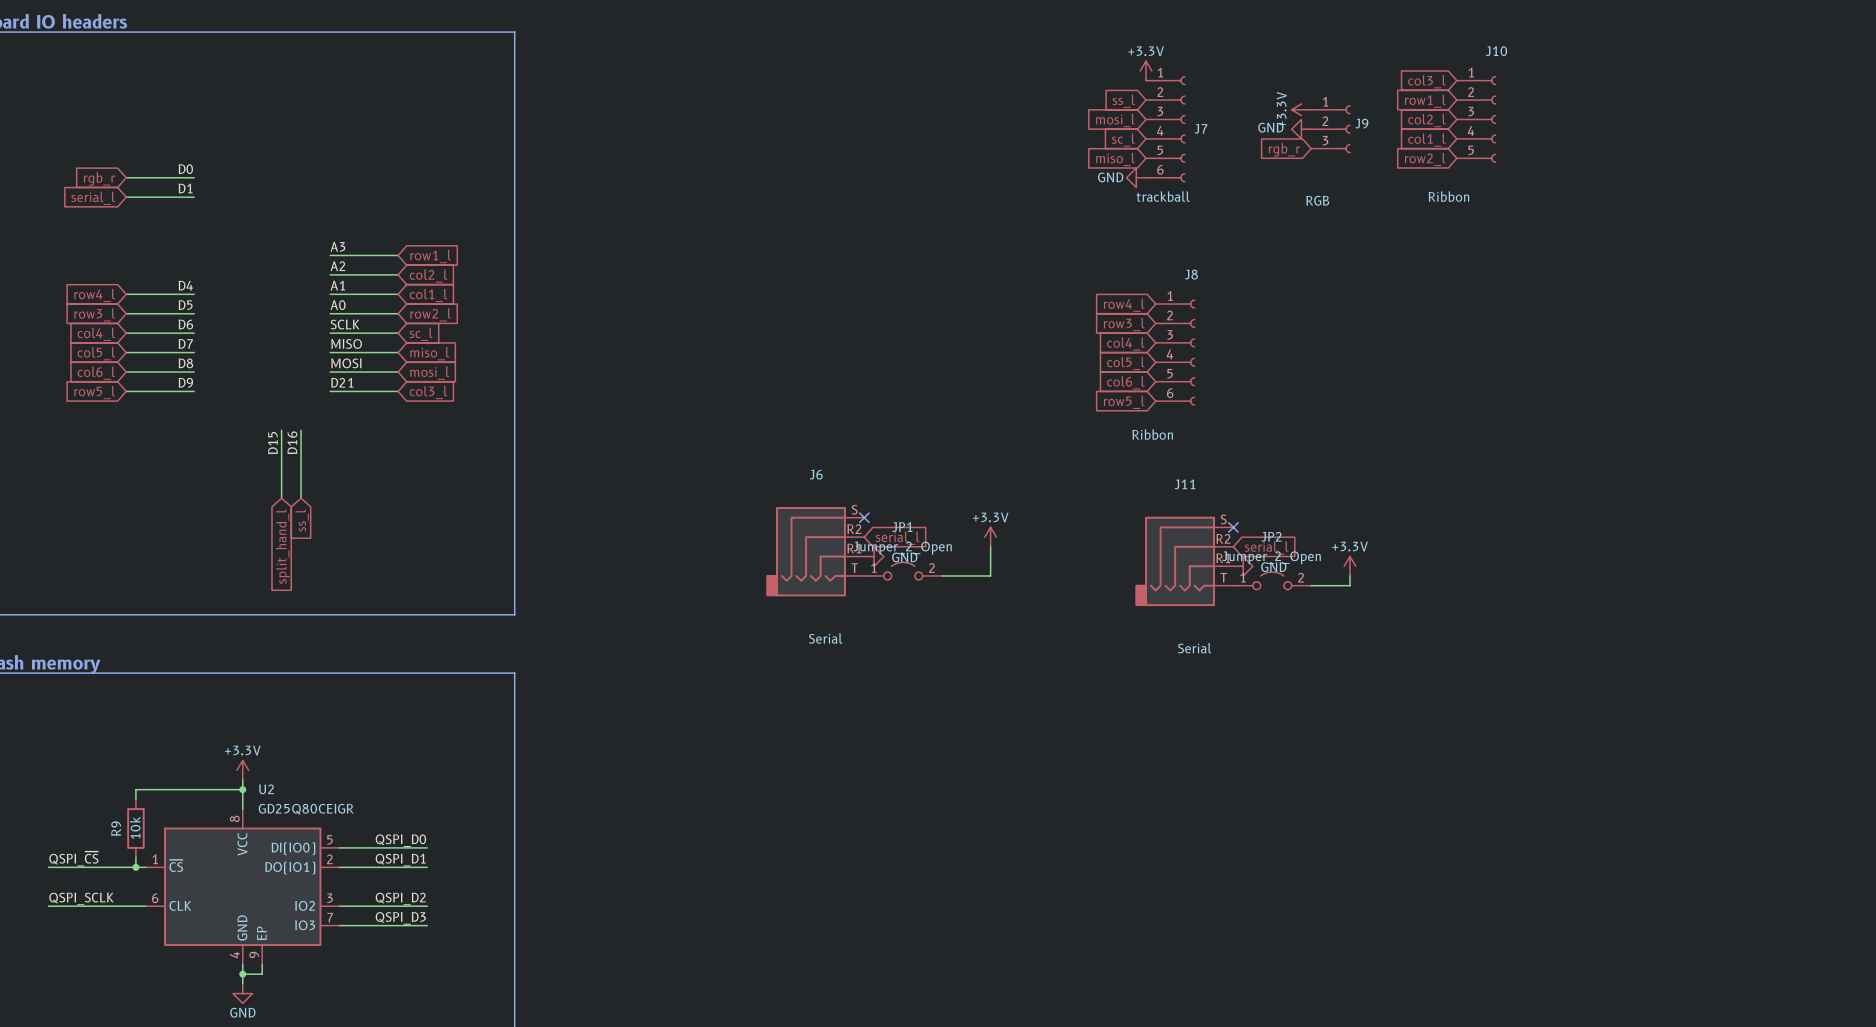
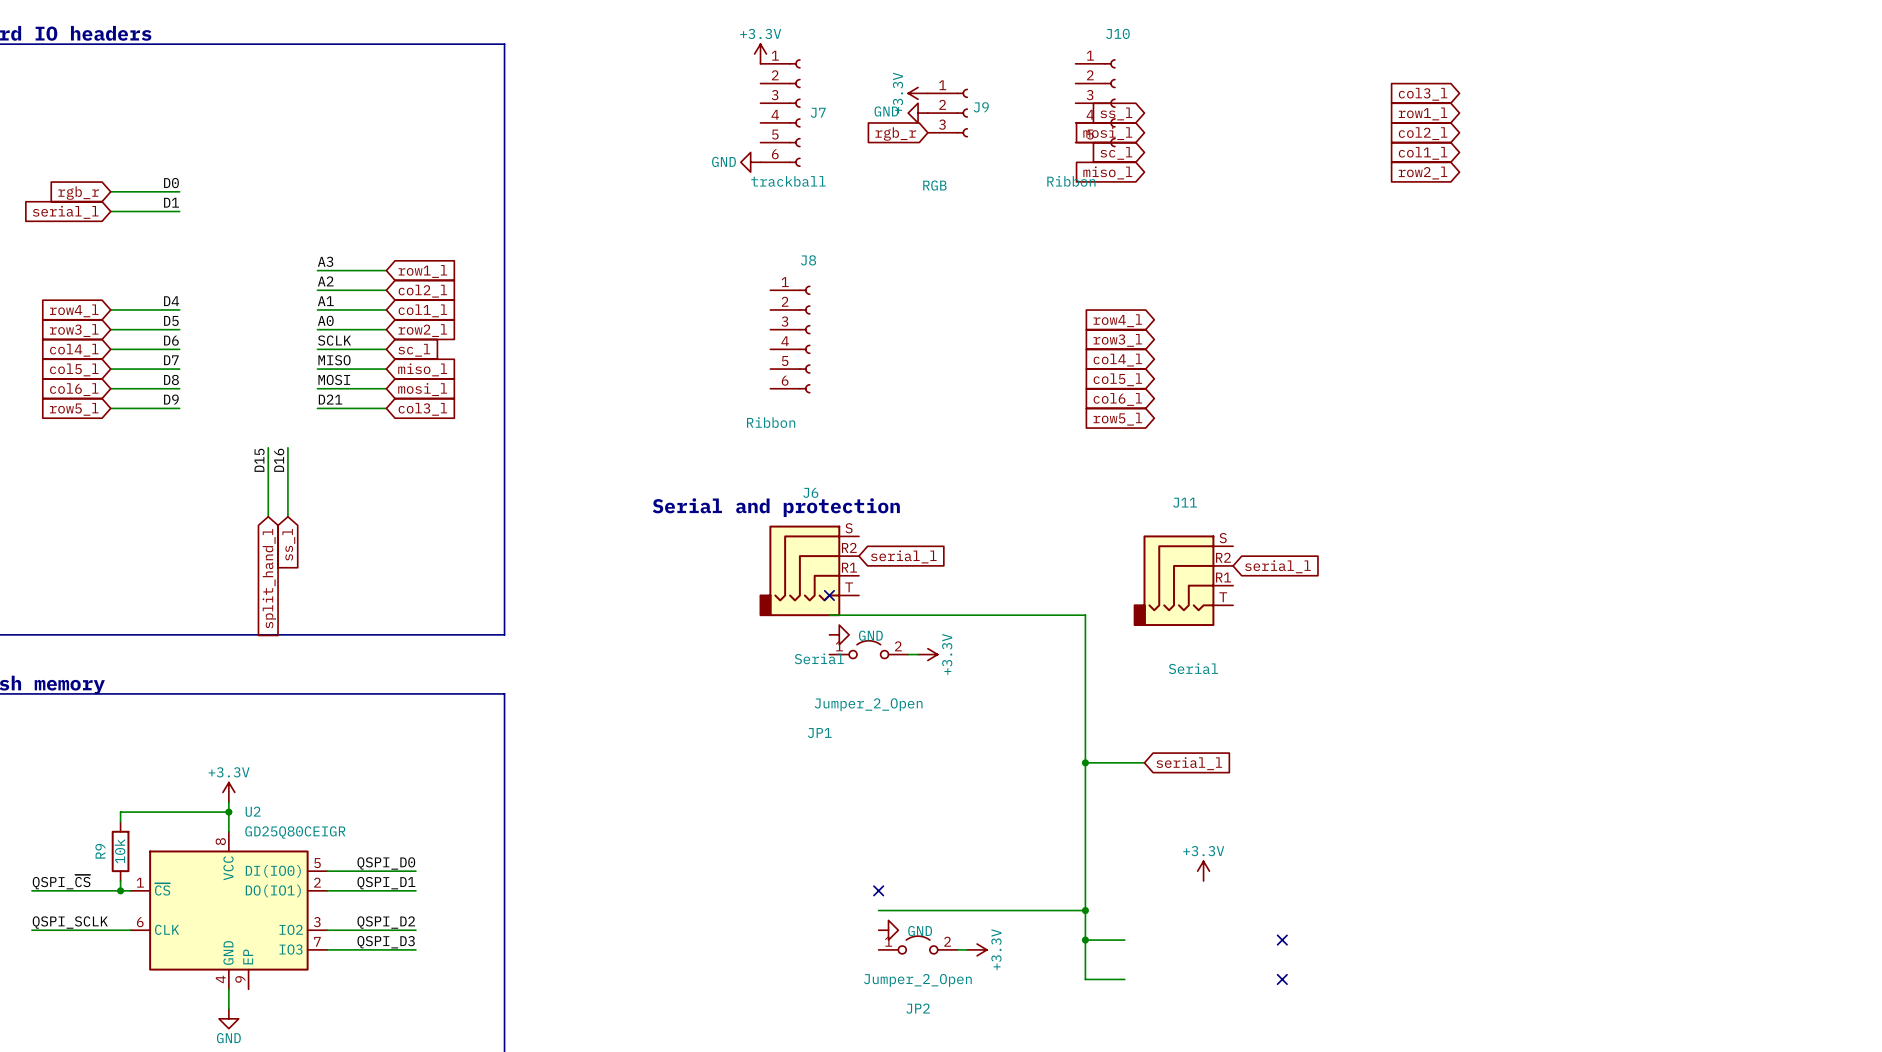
power symbol: none -> +3.3V (760, 53)
power symbol: +3.3V (1146, 70) -> none
power symbol: none -> +3.3V (918, 93)
power symbol: none -> GND (918, 113)
power symbol: +3.3V (1301, 109) -> none
J10 position: (1476, 119) -> (1095, 103)
global label: none -> rgb_r (895, 133)
J7 position: (1165, 129) -> (780, 113)
power symbol: GND (1301, 129) -> none
J9 position: (1330, 129) -> (947, 113)
power symbol: none -> GND (750, 162)
global label: rgb_r (1284, 149) -> none
power symbol: GND (1136, 177) -> none
J8 position: (1175, 352) -> (790, 339)
text: none -> Serial and protection (776, 507)
no-connect mark: (864, 517) -> none
JP1 name position: JP1 (902, 527) -> JP1 (819, 733)
no-connect mark: (1233, 527) -> none
JP2 name position: JP2 (1271, 536) -> JP2 (918, 1008)
power symbol rotation: 0° (990, 537) -> 90° clockwise (927, 654)
power symbol position: +3.3V (990, 537) -> +3.3V (927, 654)
wire: (990, 546) (990, 575) (942, 575) -> none
JP1 value position: Jumper_2_Open (902, 548) -> Jumper_2_Open (868, 704)
power symbol position: GND (874, 556) -> GND (839, 634)
JP2 value position: Jumper_2_Open (1271, 557) -> Jumper_2_Open (917, 980)
power symbol: GND (1243, 566) -> none
power symbol: +3.3V (1349, 566) -> none
JP1 position: (903, 571) -> (868, 649)
no-connect mark: none -> (829, 595)
wire: (1349, 575) (1349, 585) (1311, 585) -> none
JP2 position: (1272, 580) -> (918, 944)
wire: none -> (829, 615) (1085, 615) (1085, 979) (1124, 979)
wire: none -> (908, 654) (918, 654)
wire: none -> (1085, 762) (1144, 762)
junction: none -> (1085, 762)
global label: none -> serial_l (1189, 763)
power symbol: none -> +3.3V (1203, 871)
no-connect mark: none -> (878, 890)
wire: none -> (878, 910) (1085, 910)
junction: none -> (1085, 910)
power symbol: none -> GND (888, 930)
wire: none -> (1085, 940) (1124, 940)
junction: none -> (1085, 940)
no-connect mark: none -> (1282, 940)
wire: none -> (957, 949) (967, 949)
power symbol: none -> +3.3V (977, 949)
no-connect mark: none -> (1282, 979)
wire: (262, 964) (262, 974) (242, 974) -> none
junction: (242, 974) -> none

